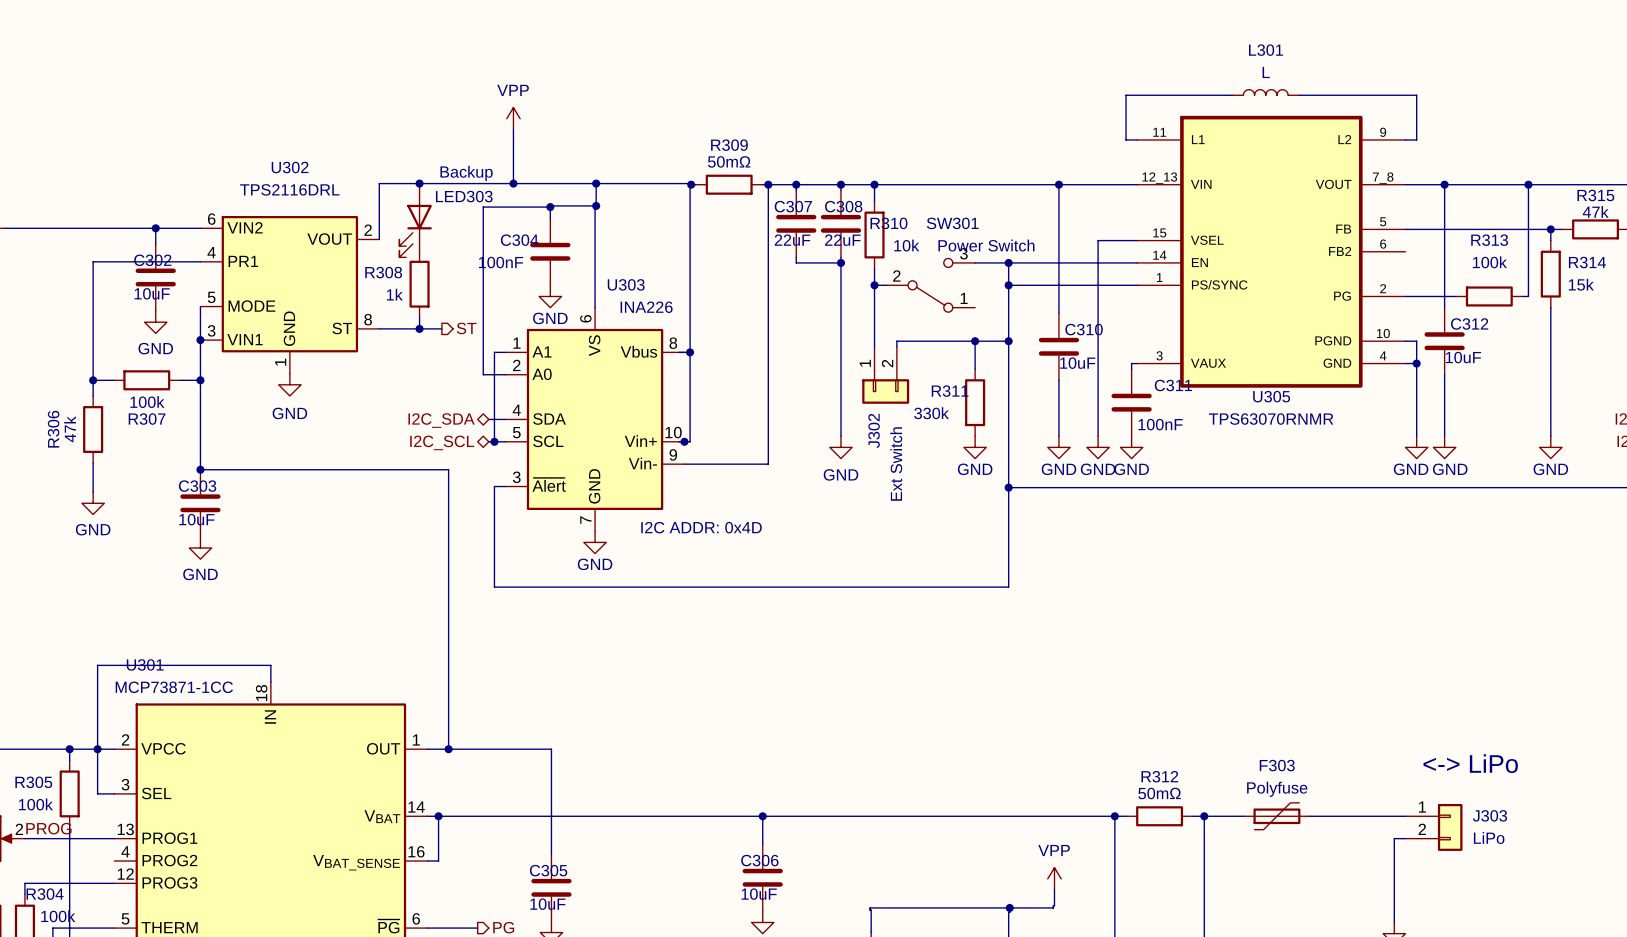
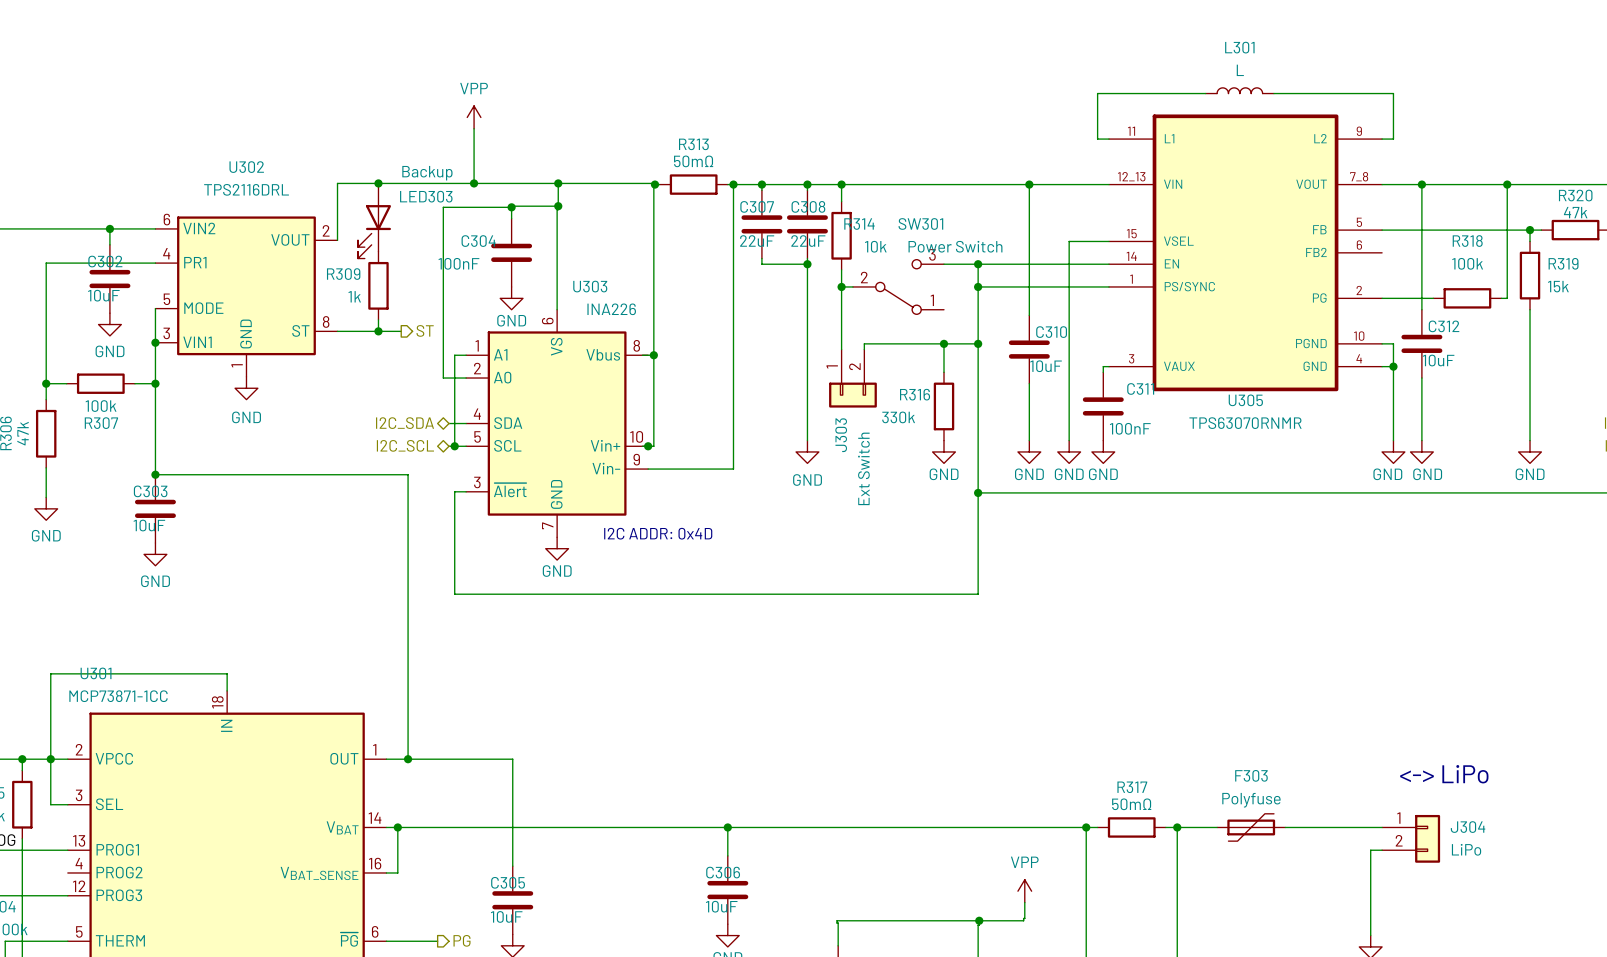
R309 name: R309 (729, 145) -> R313 (693, 144)
R315 name: R315 (1595, 195) -> R320 (1575, 195)
R310 name: R310 (888, 223) -> R314 (859, 224)
R313 name: R313 (1489, 240) -> R318 (1467, 241)
R314 name: R314 (1587, 262) -> R319 (1563, 263)
R308 name: R308 (383, 272) -> R309 (343, 274)
R311 name: R311 (950, 391) -> R316 (915, 394)
J302 name: J302 (874, 430) -> J303 (841, 435)
R312 name: R312 (1159, 776) -> R317 (1132, 787)
J303 name: J303 (1489, 815) -> J304 (1468, 827)

